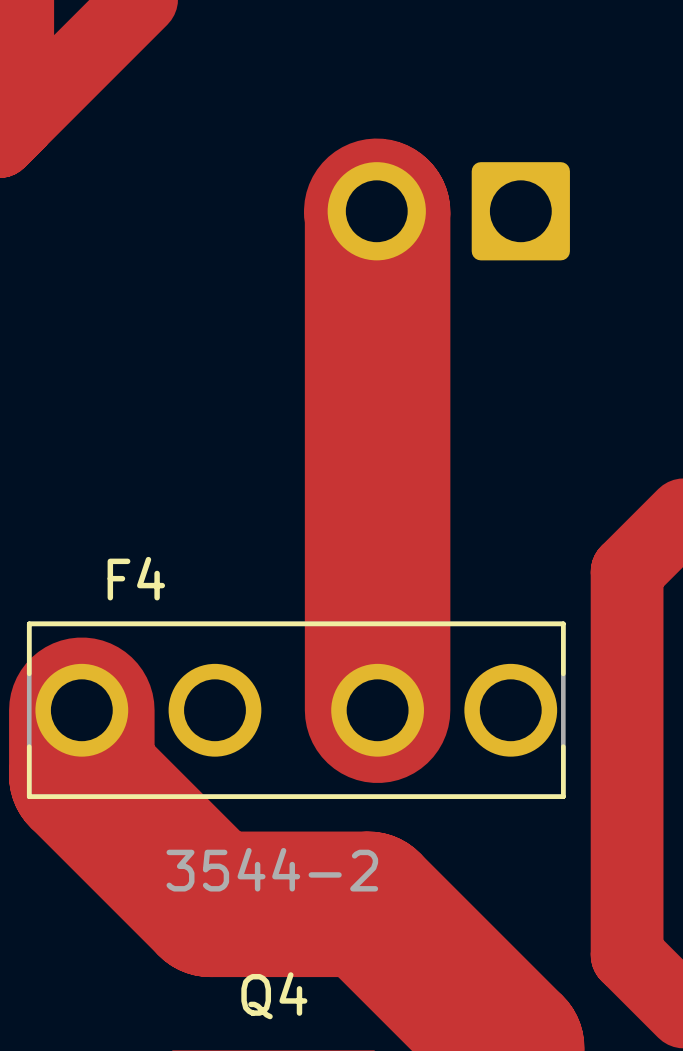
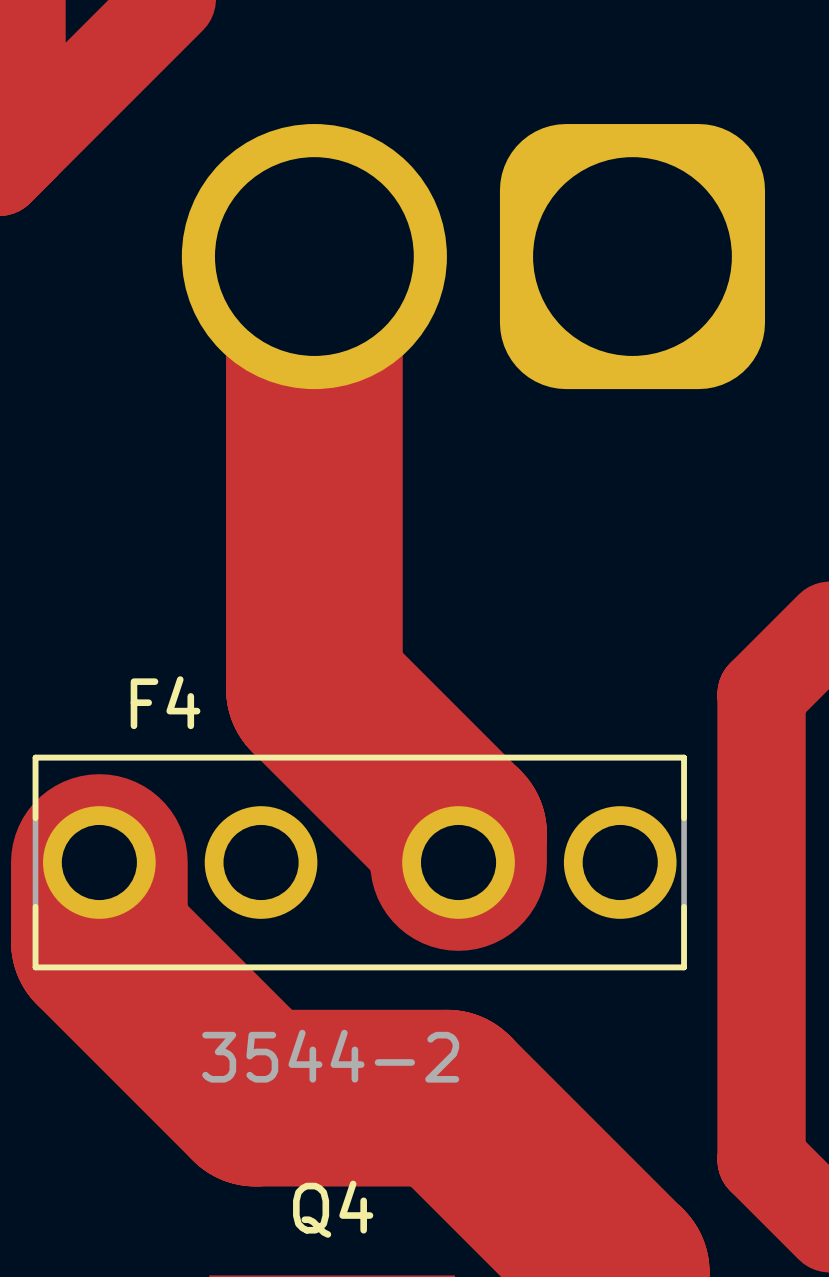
track: (376, 211) (377, 686) -> (314, 256) (314, 689) (458, 833)
part: none -> (473, 256)
part: (448, 211) -> none

